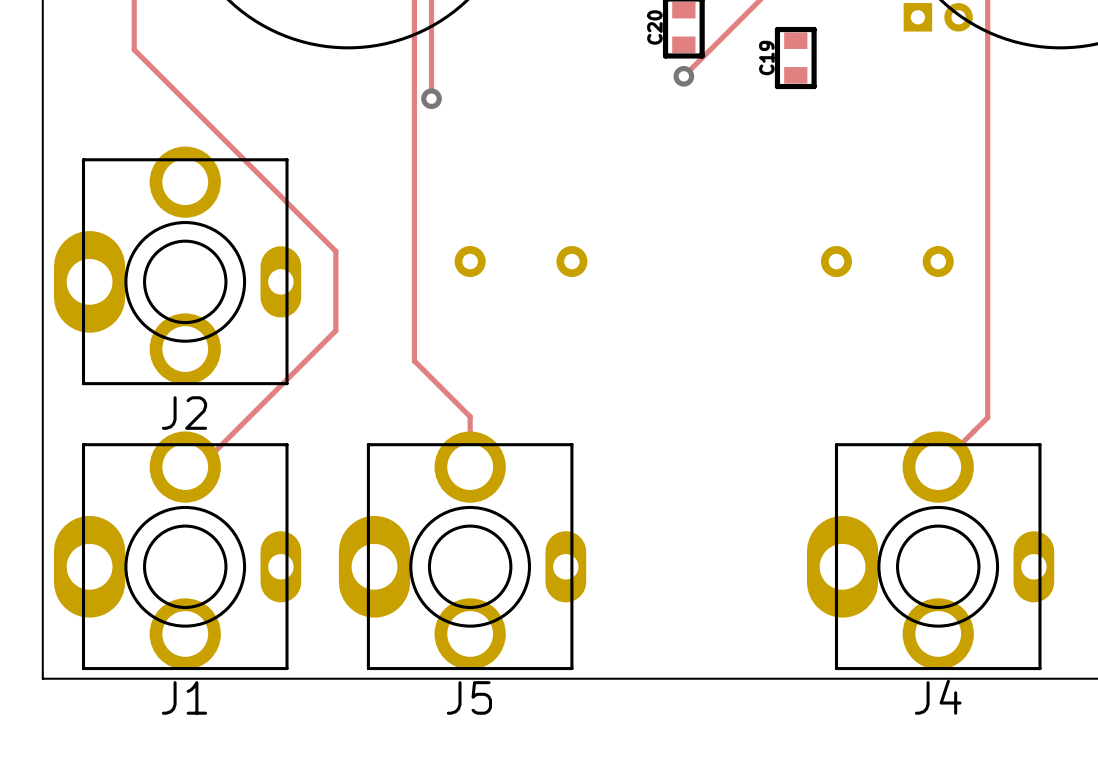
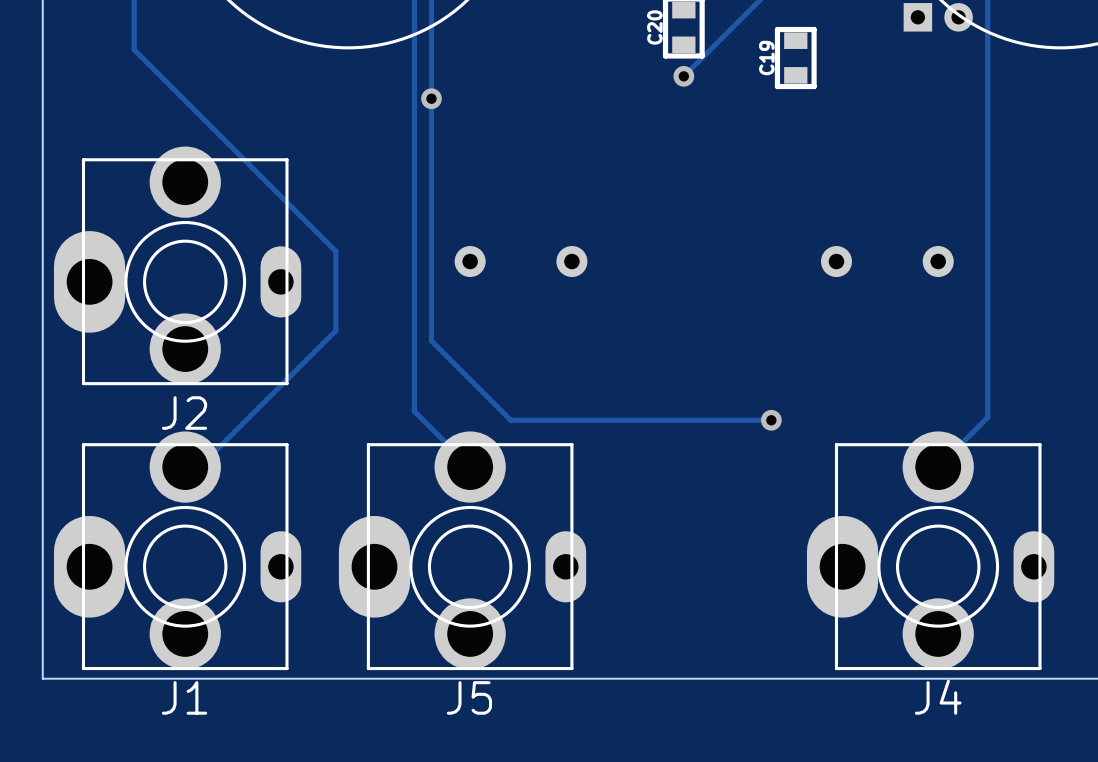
track: none -> (431, 98) (431, 340) (510, 420) (771, 420)
track: (414, 360) (470, 416) (470, 467) -> (414, 360) (414, 411) (470, 467)
via: none -> (771, 420)

